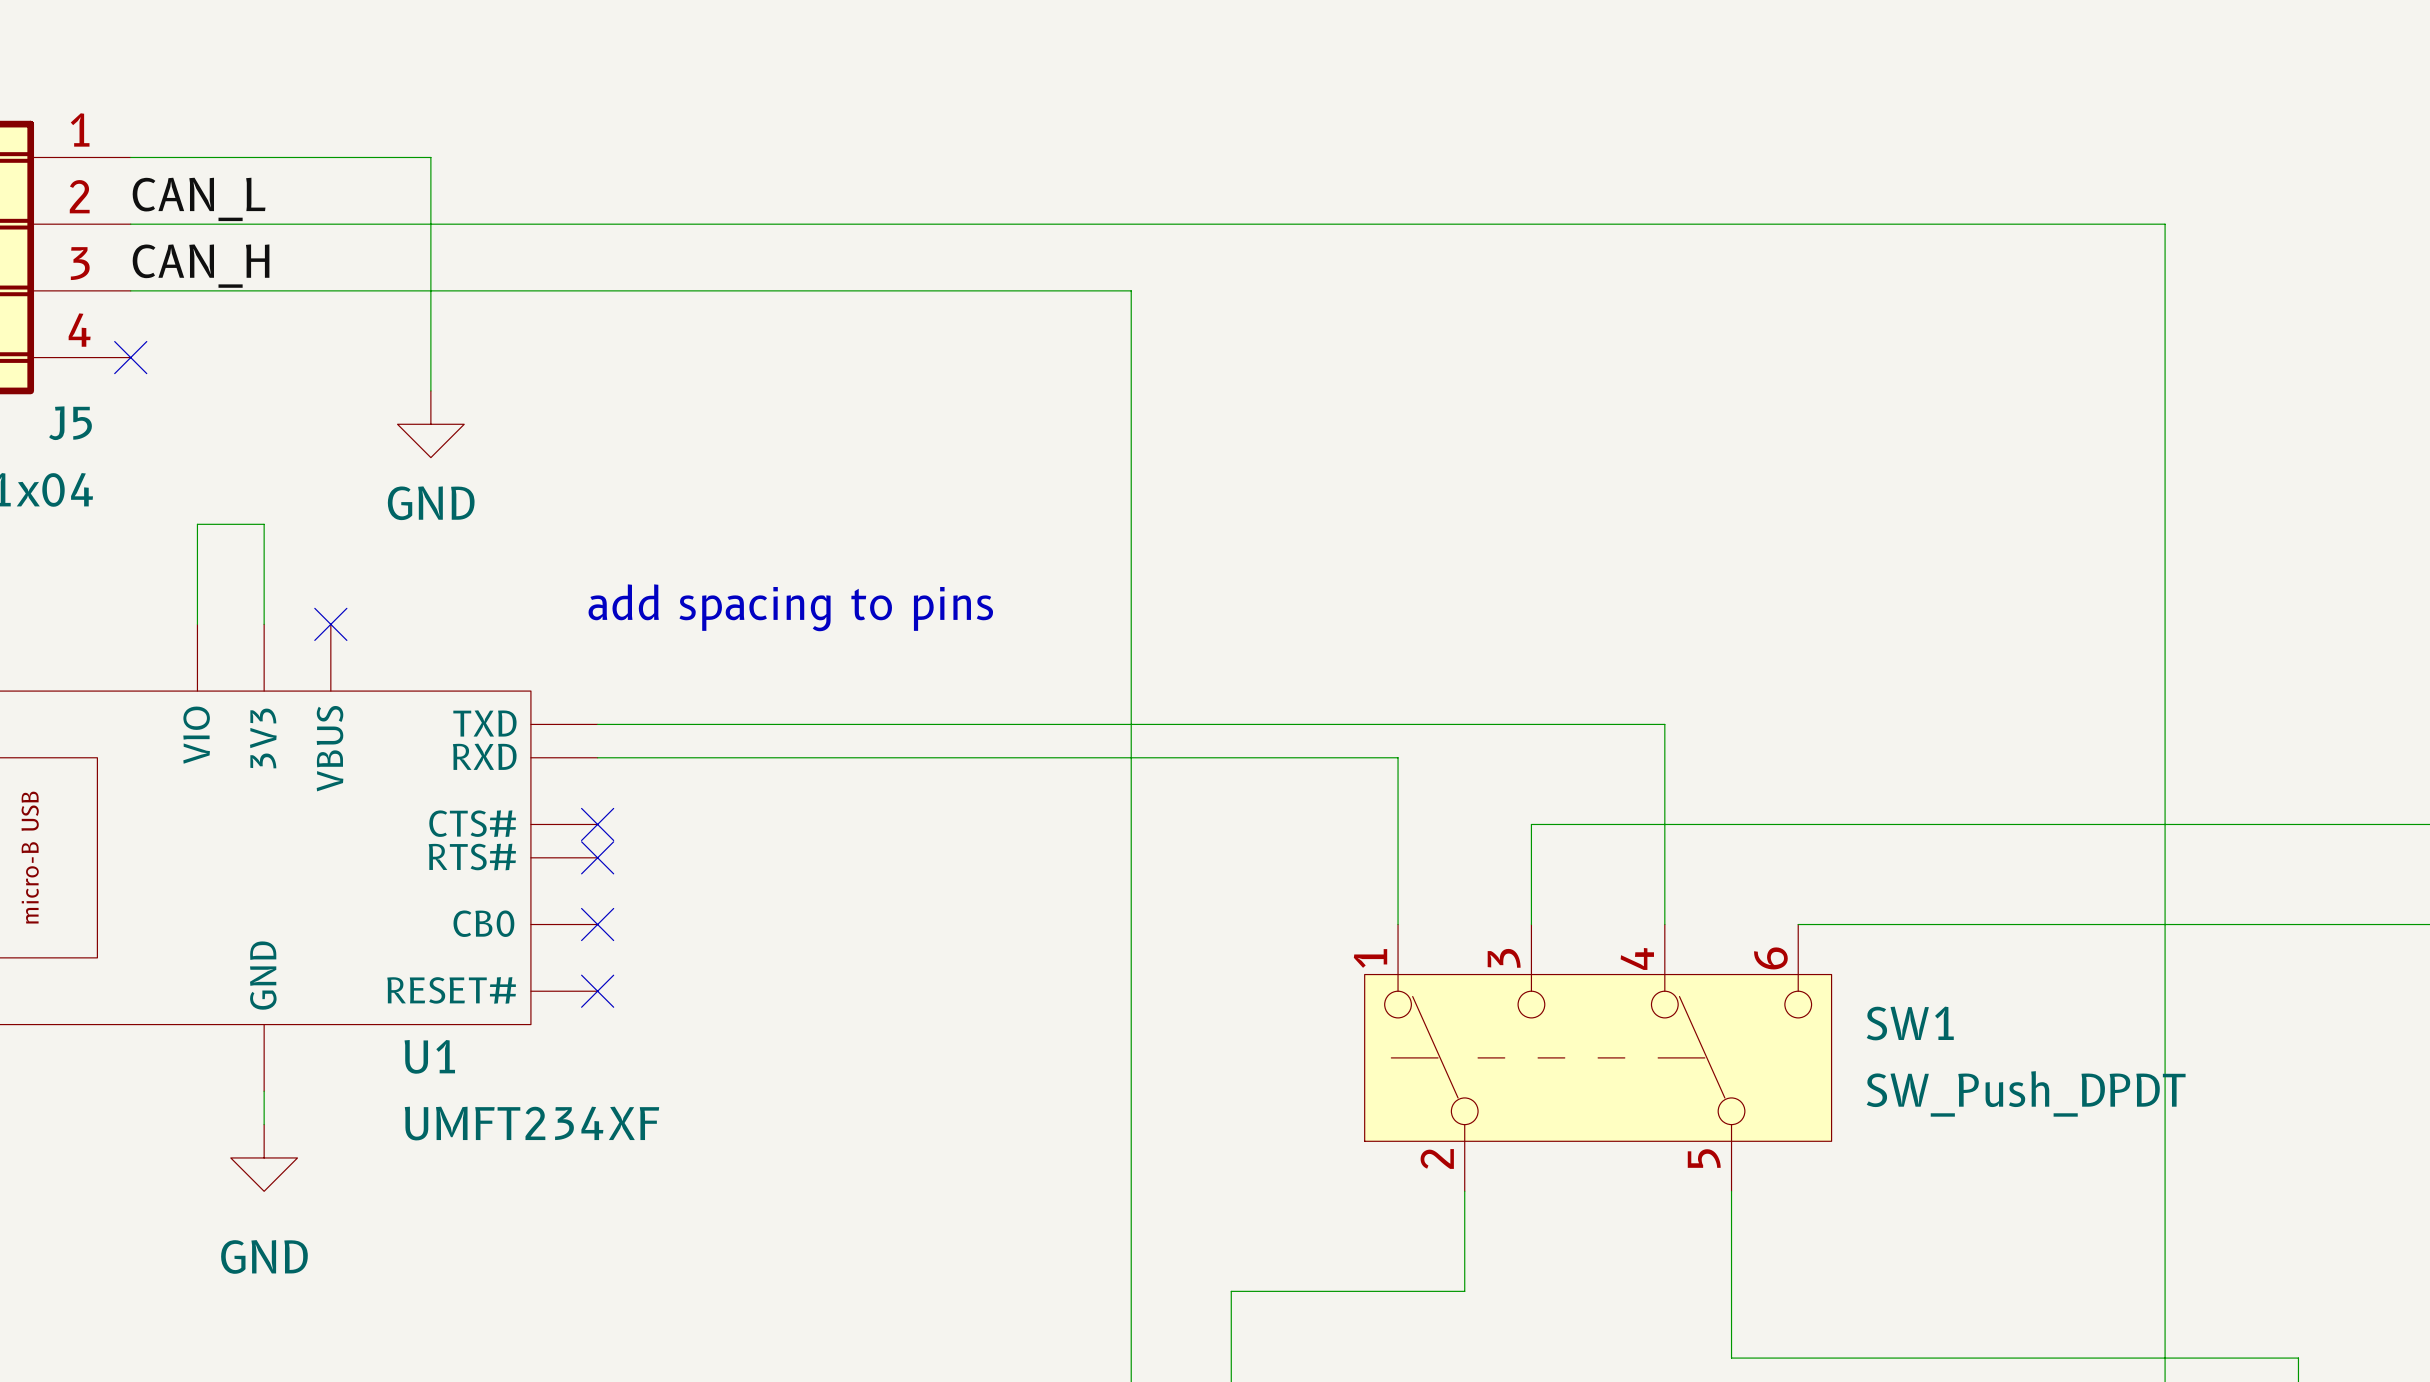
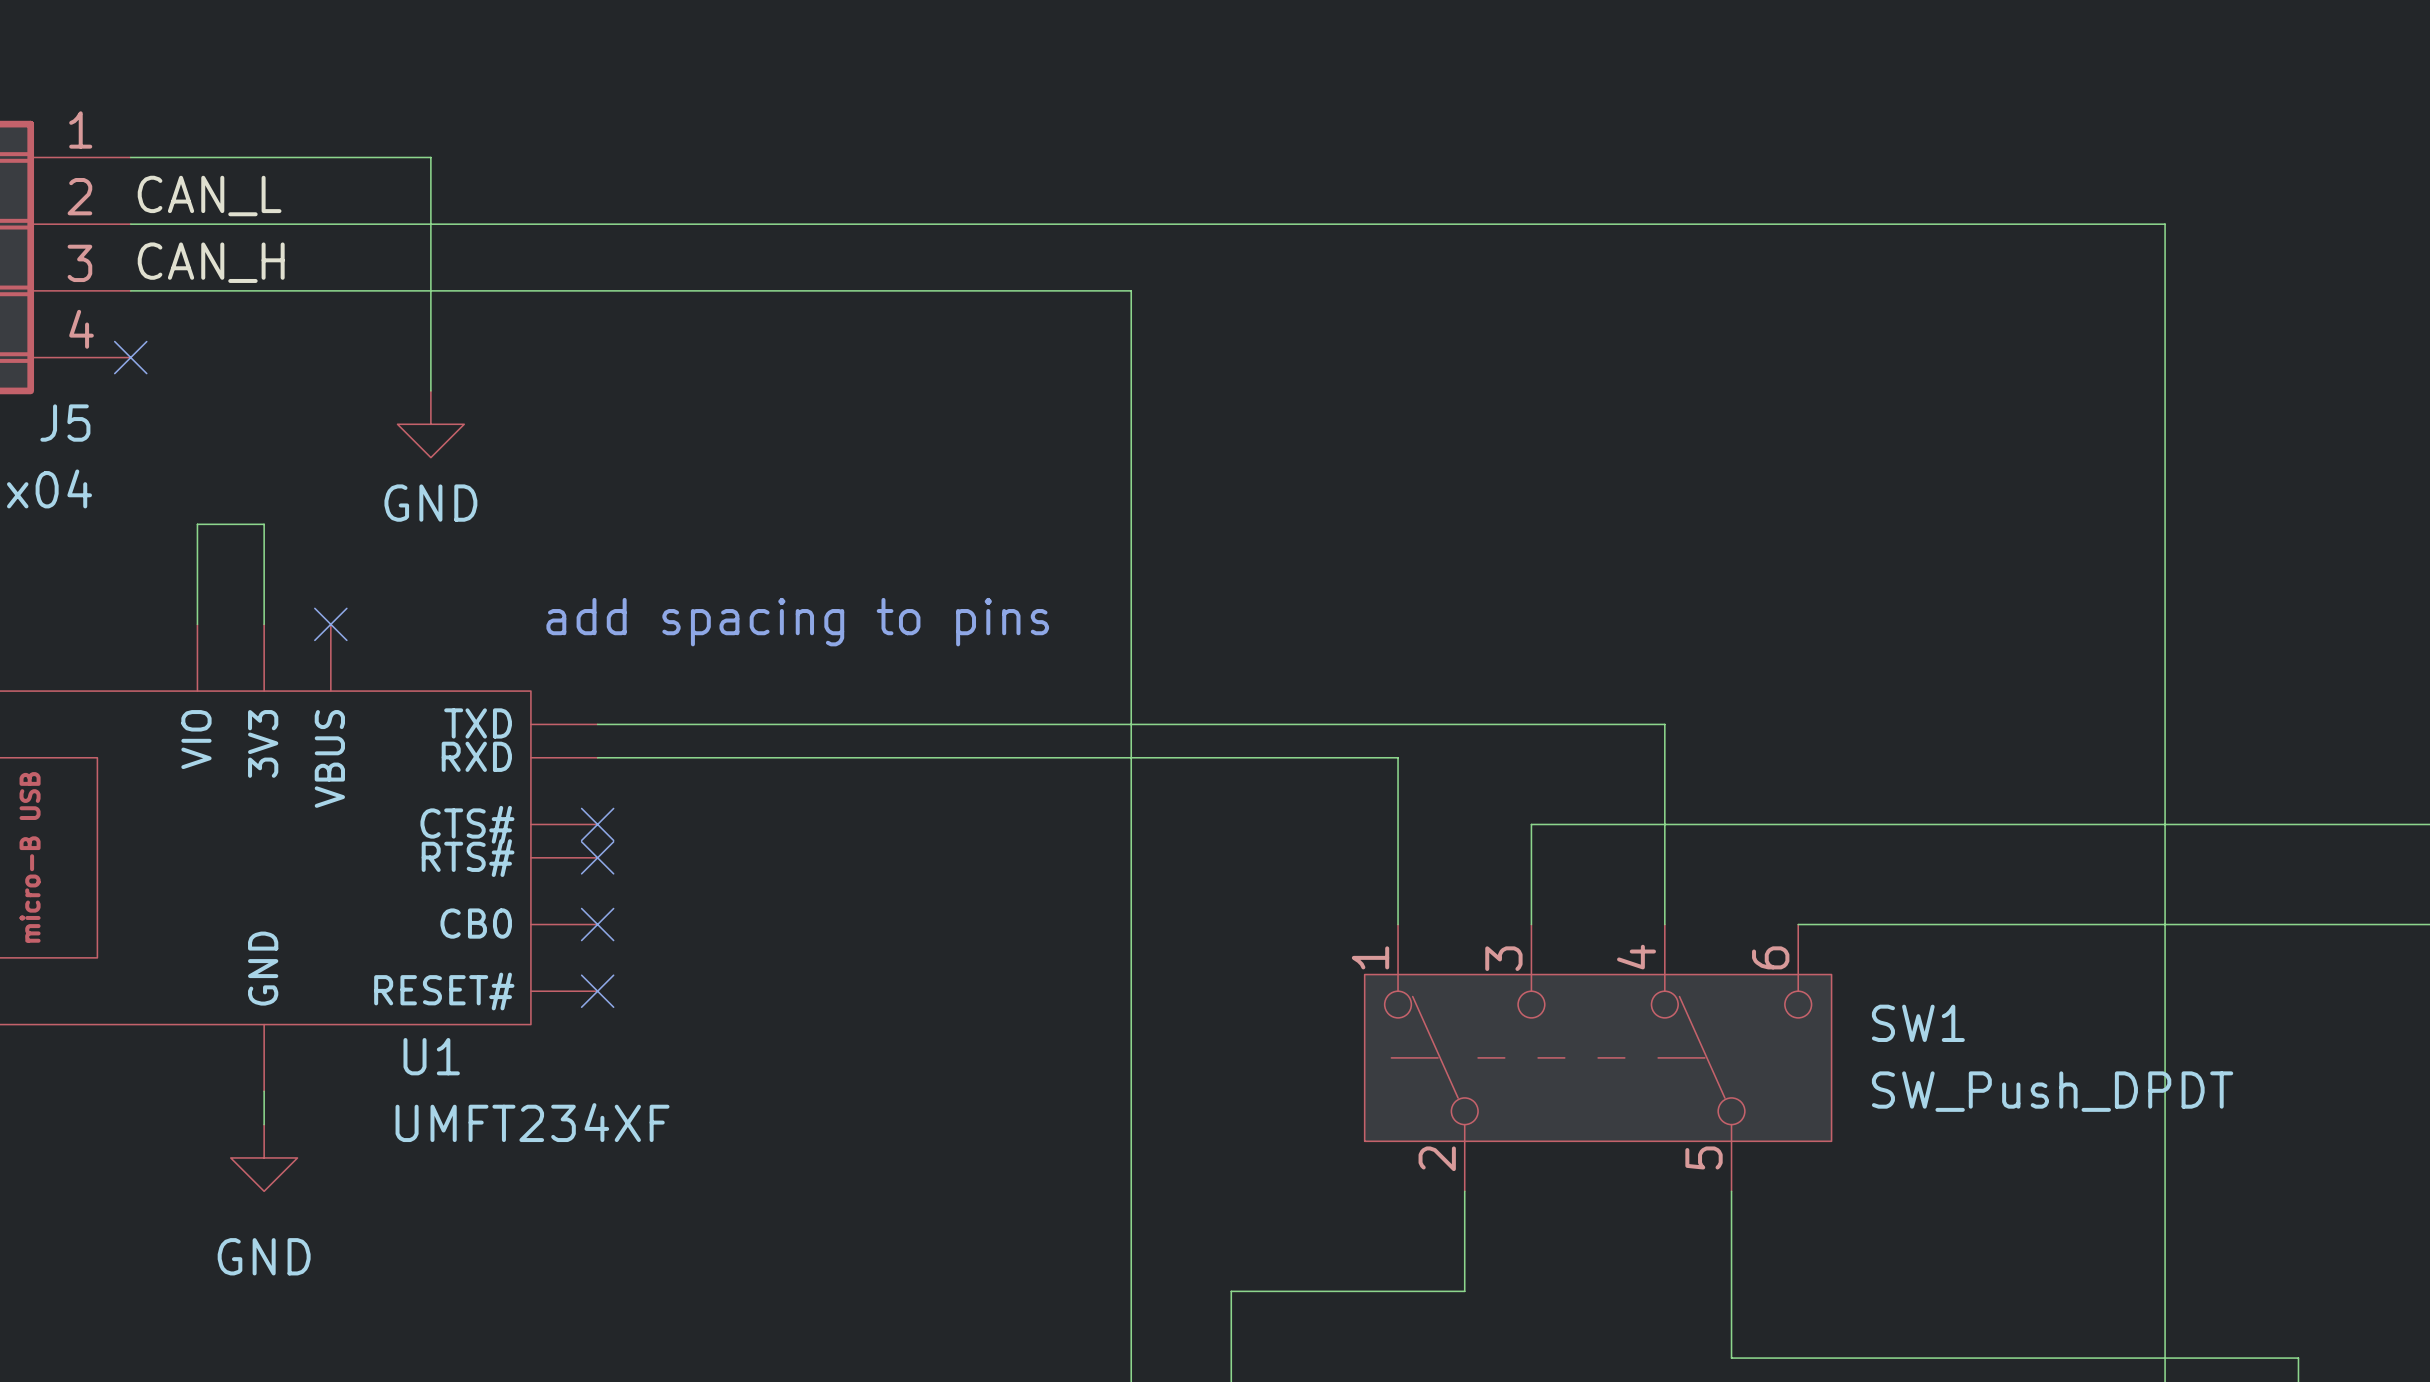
text position: add spacing to pins (790, 607) -> add spacing to pins (797, 622)

